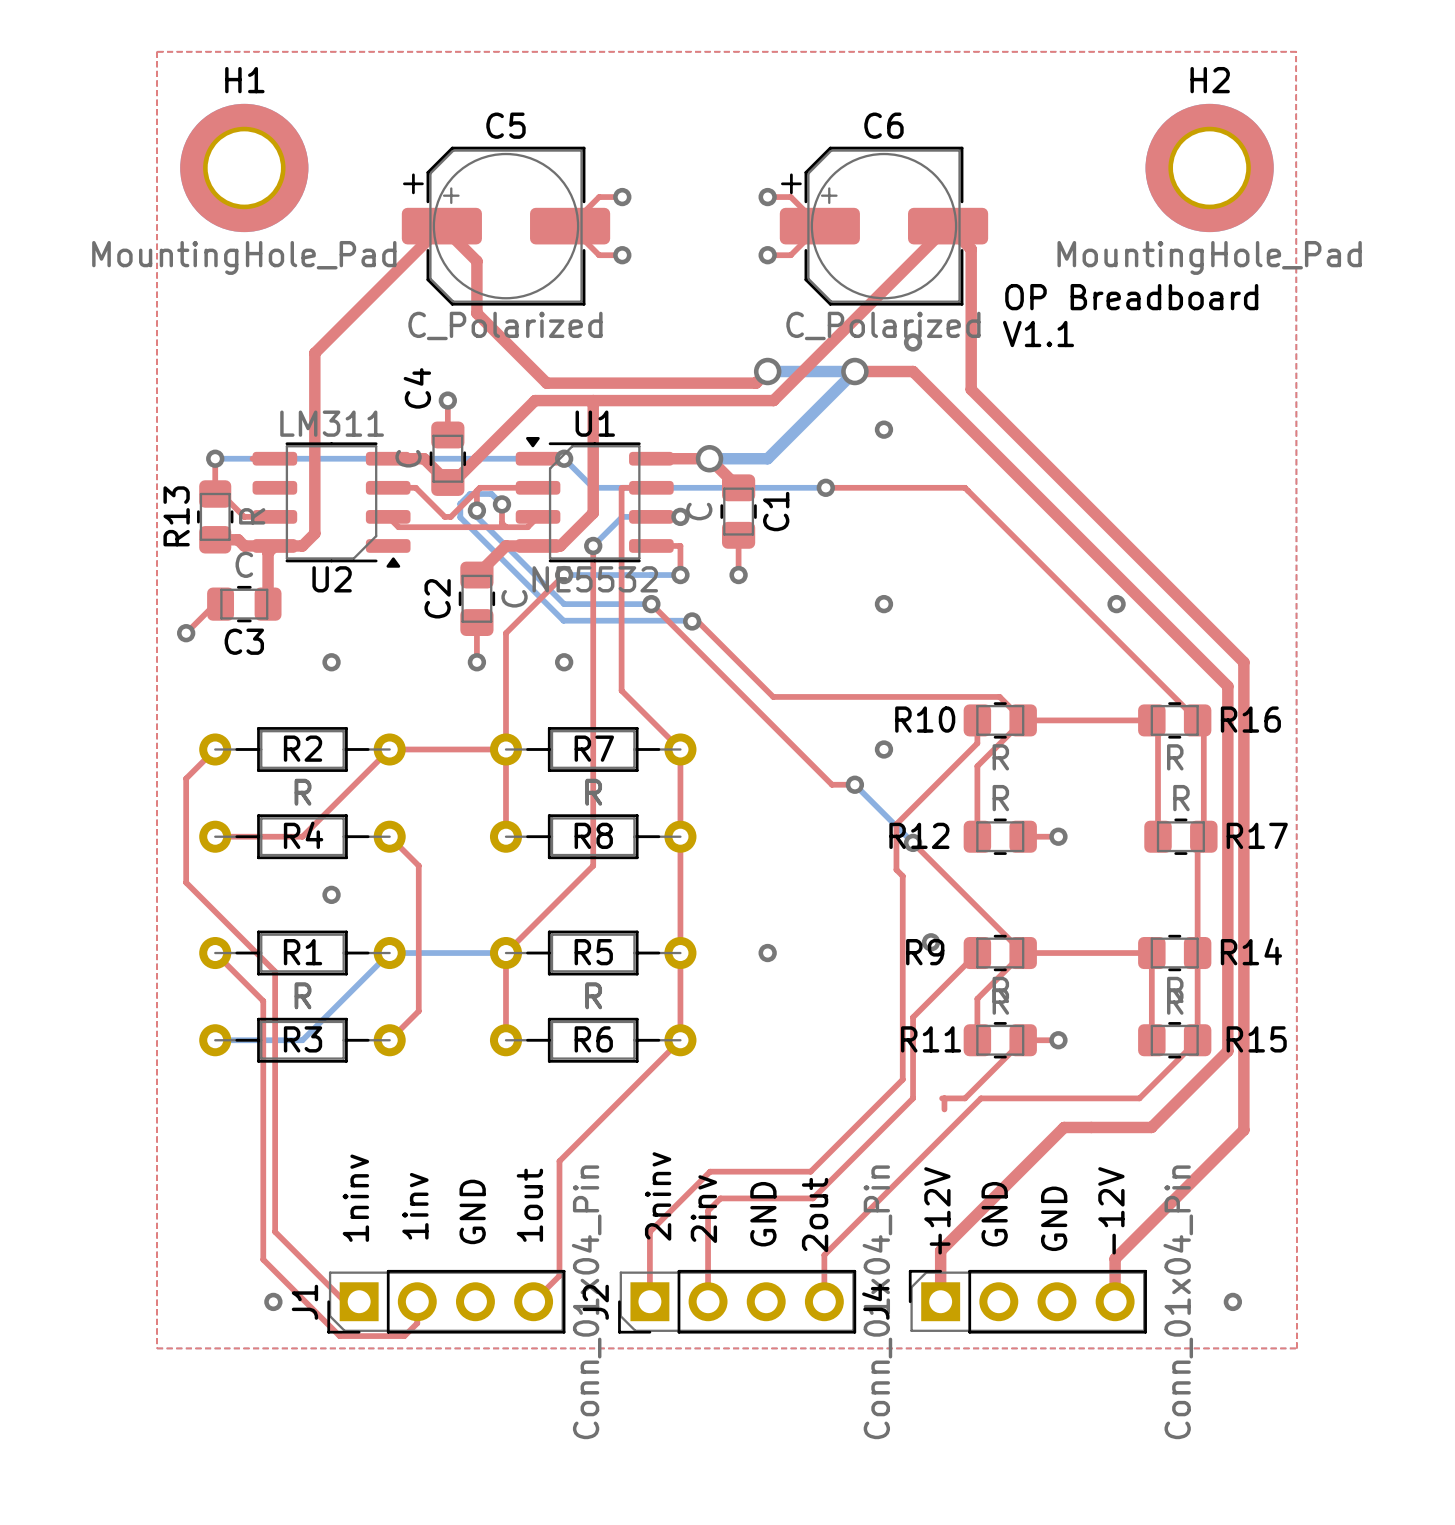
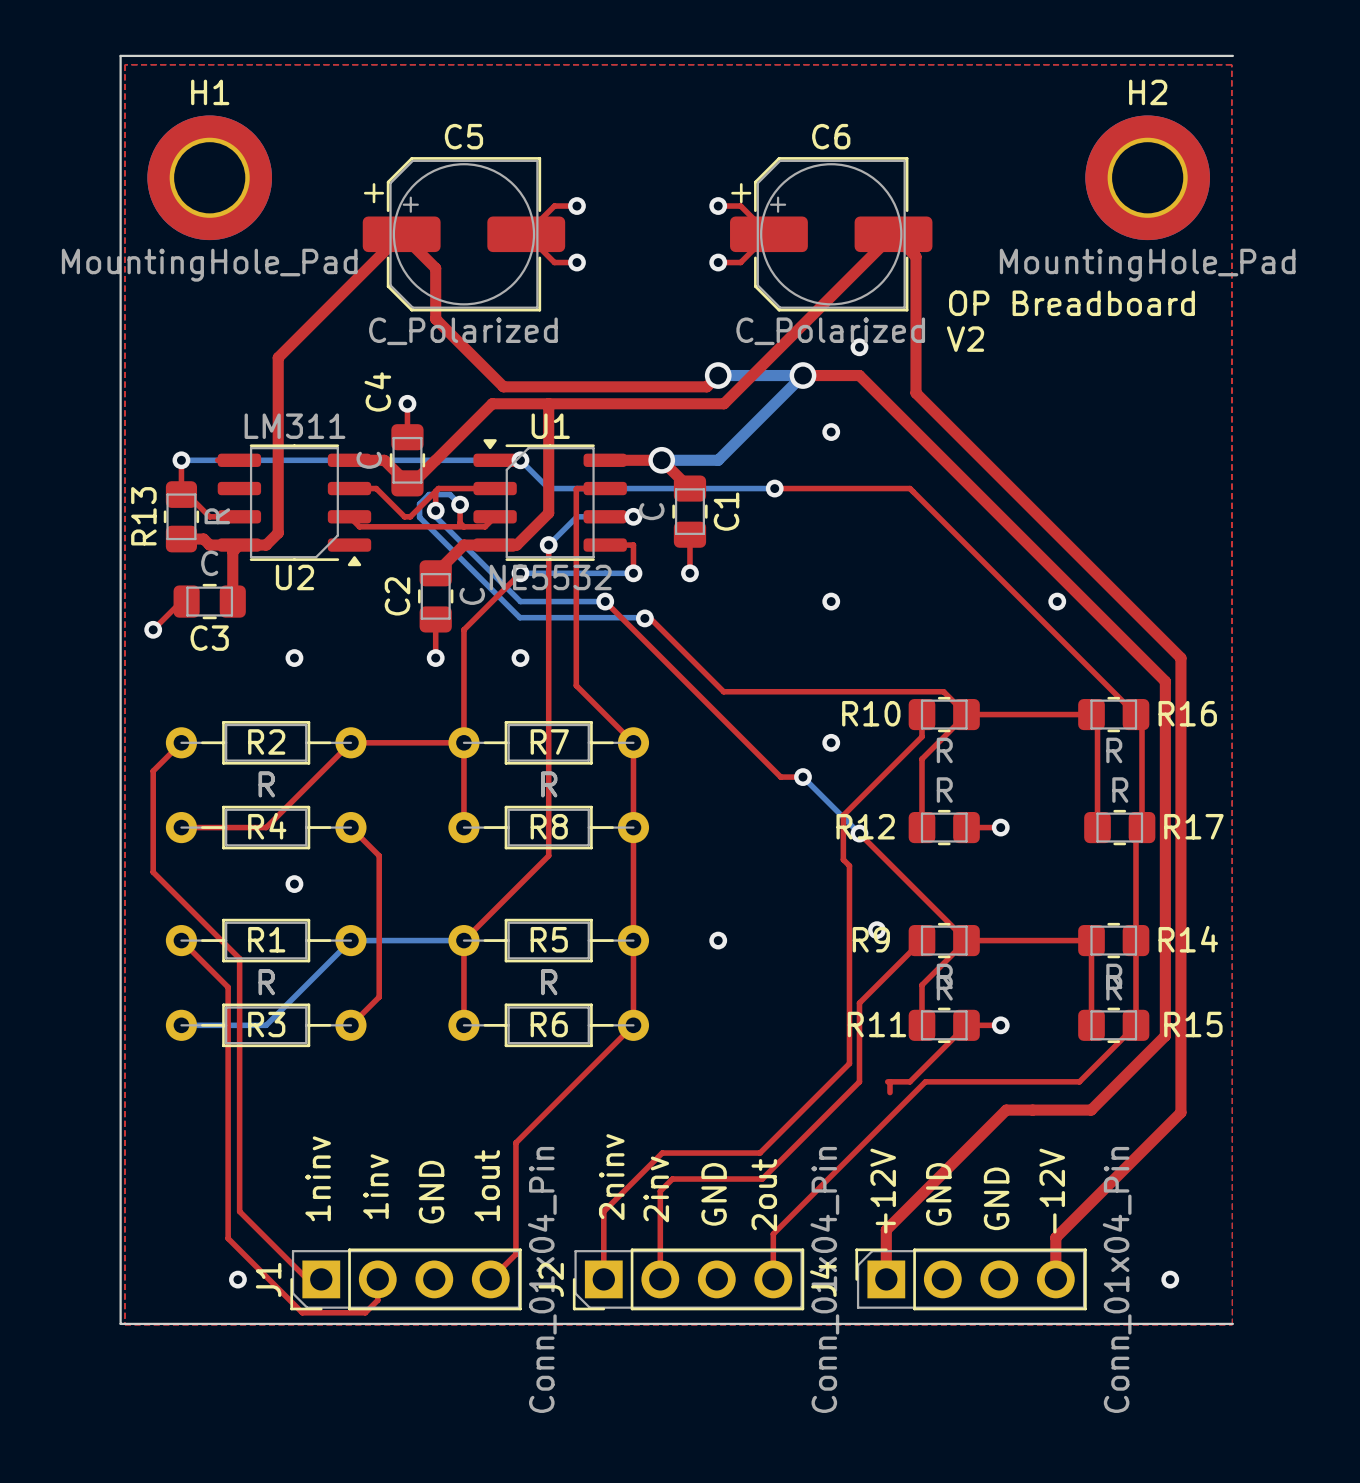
board edge: none -> (1232, 55) (120, 55) (120, 1323) (1232, 1323)
text: V1.1 (1038, 334) -> V2 (965, 339)

